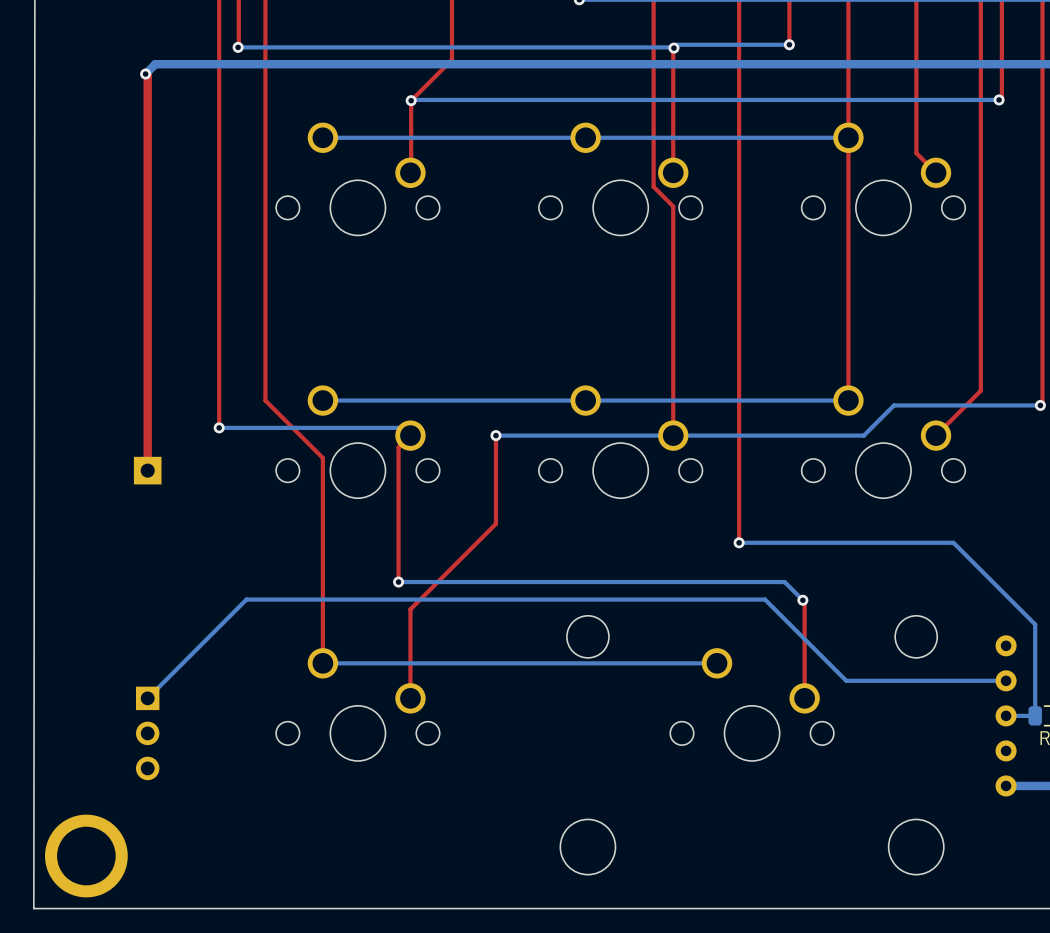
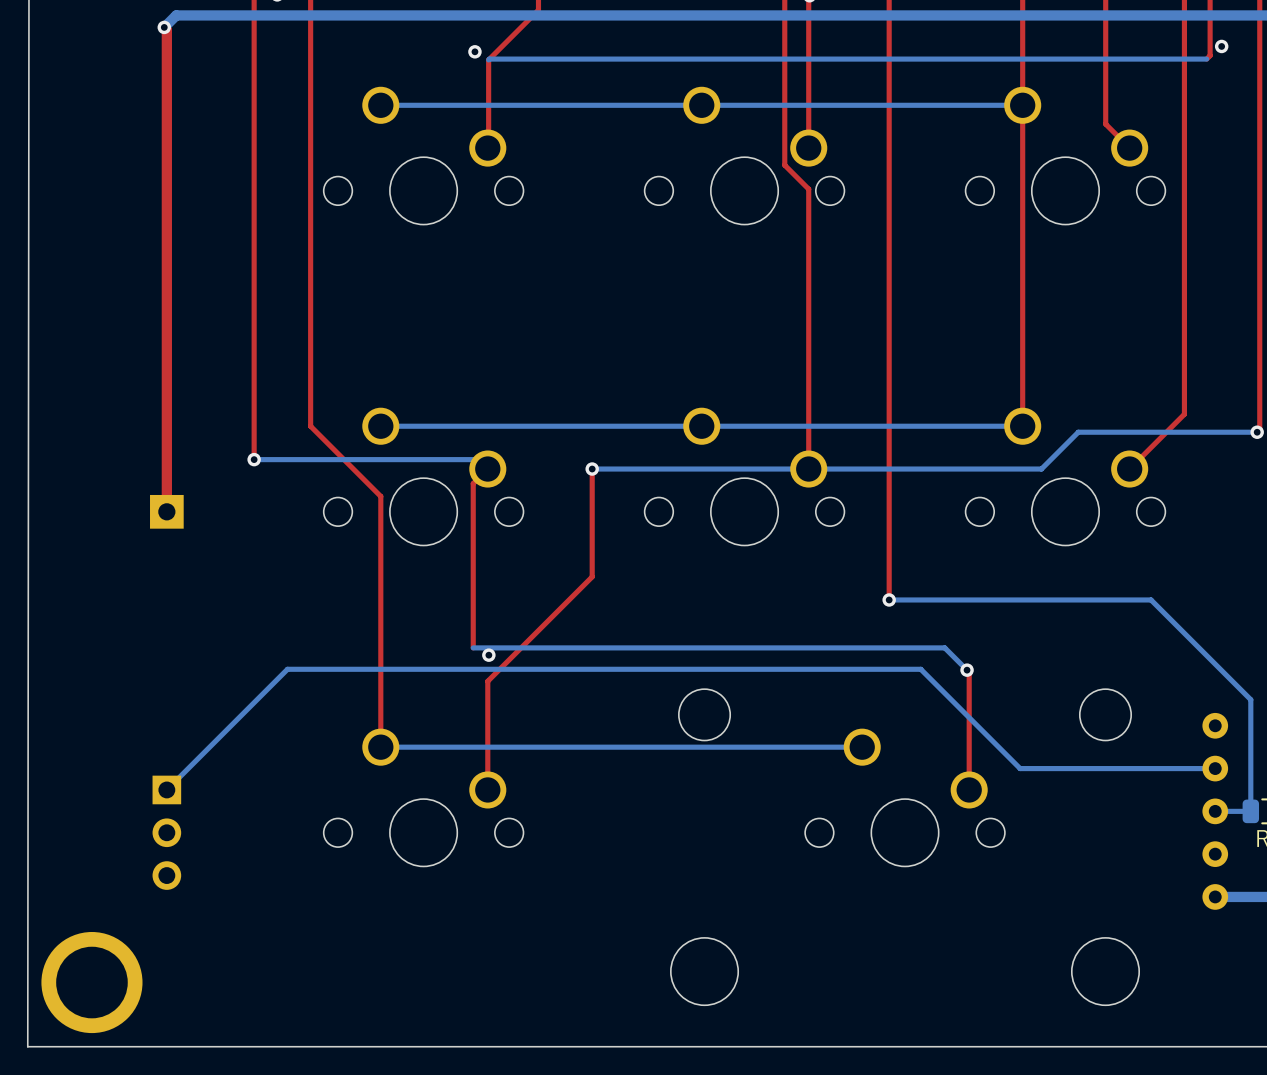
via position: (999, 99) -> (1221, 46)
via position: (411, 100) -> (474, 51)
via position: (398, 582) -> (488, 655)

